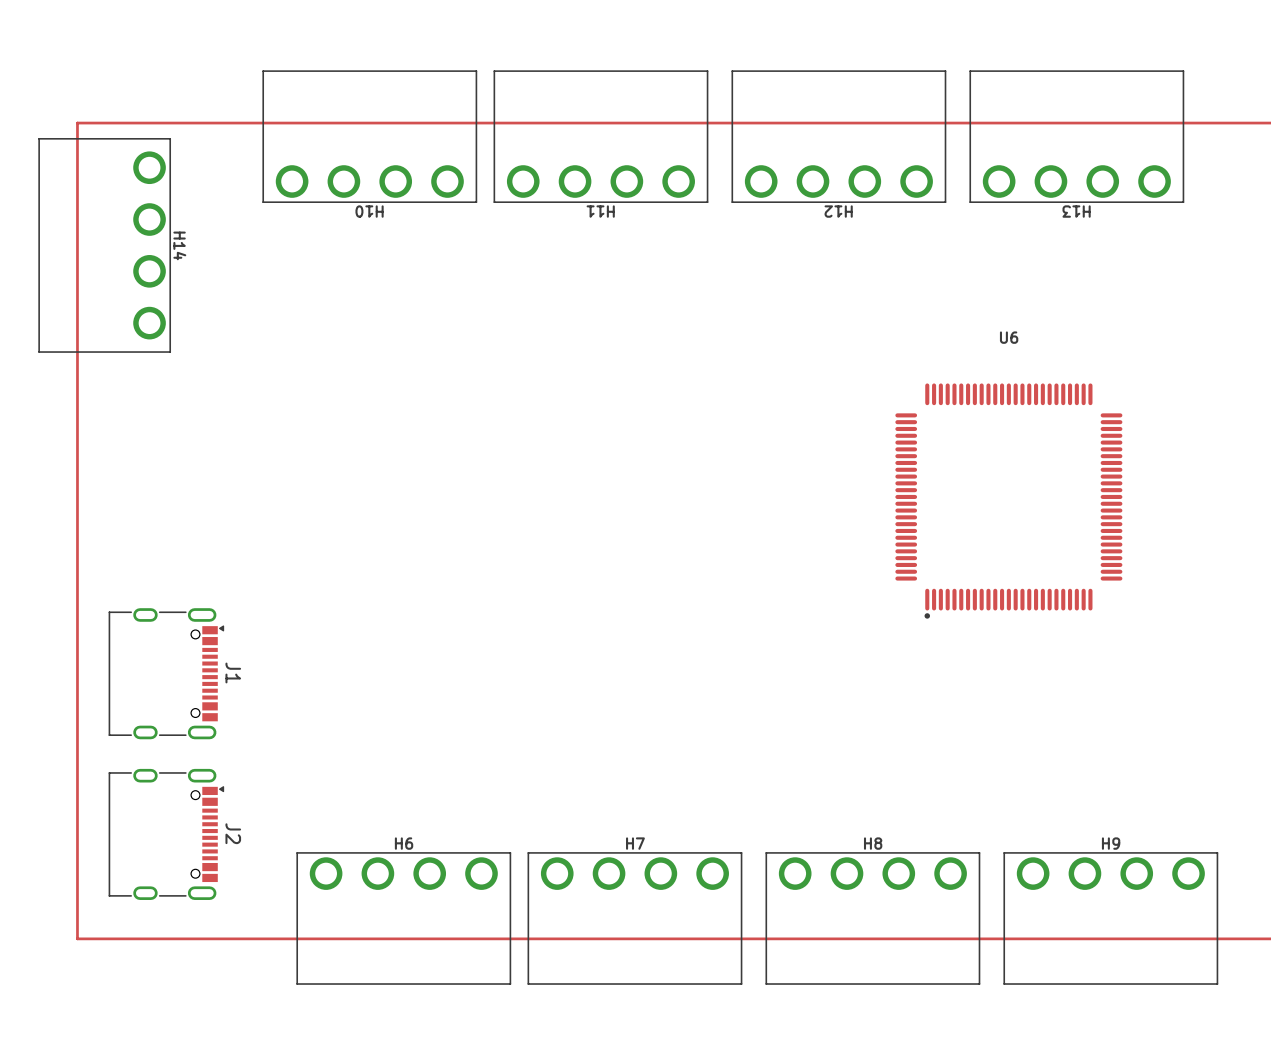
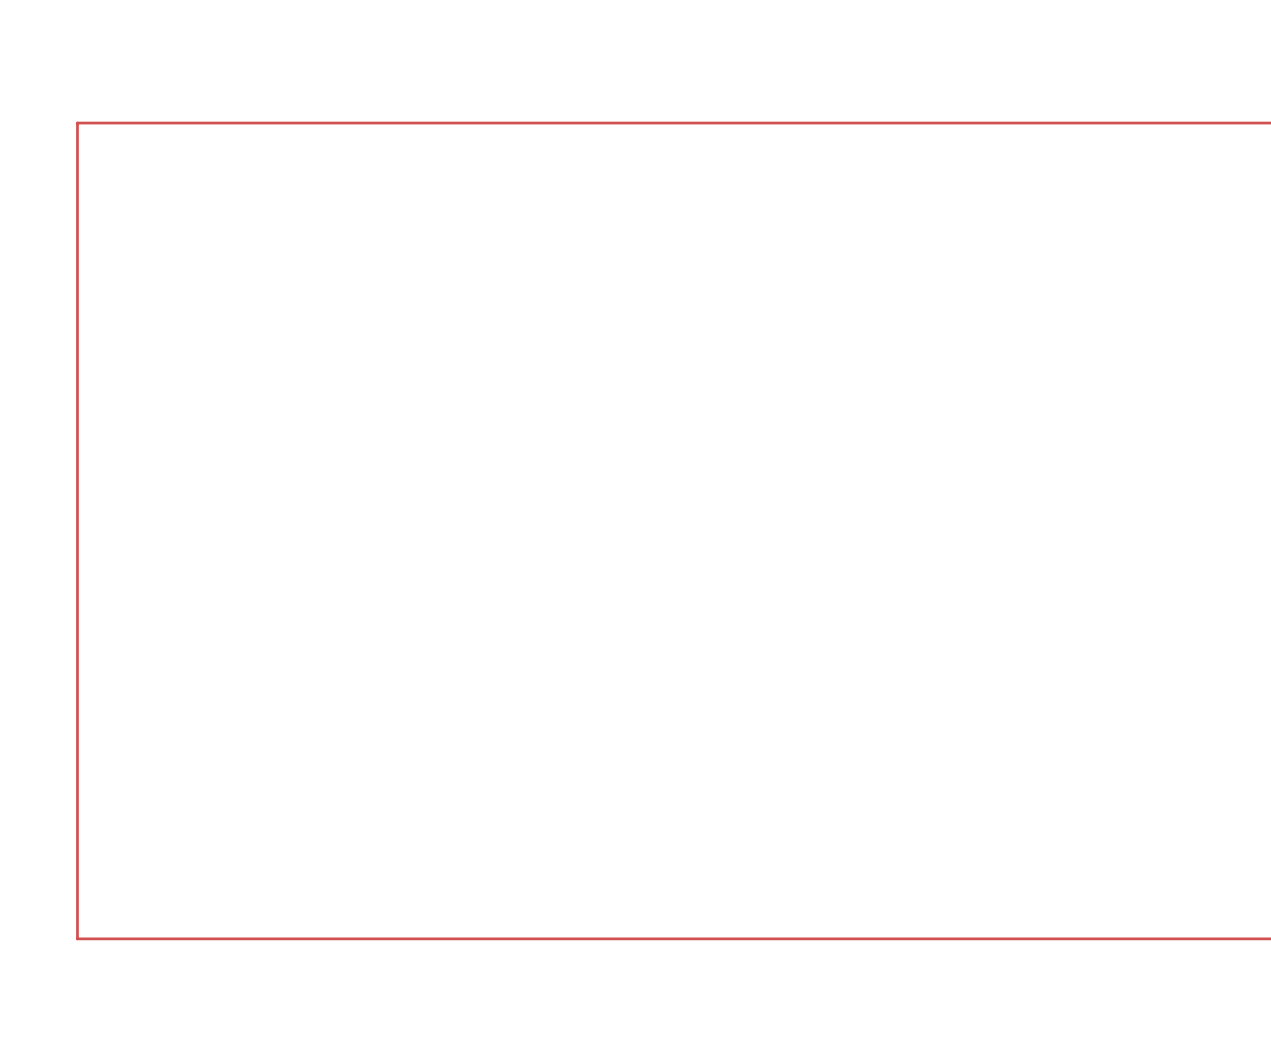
H10: (369, 136) -> none
H11: (600, 136) -> none
H12: (838, 136) -> none
H13: (1076, 136) -> none
H14: (104, 245) -> none
U6: (1008, 501) -> none
J1: (166, 673) -> none
J2: (166, 834) -> none
H6: (403, 918) -> none
H7: (634, 918) -> none
H8: (872, 918) -> none
H9: (1110, 918) -> none

